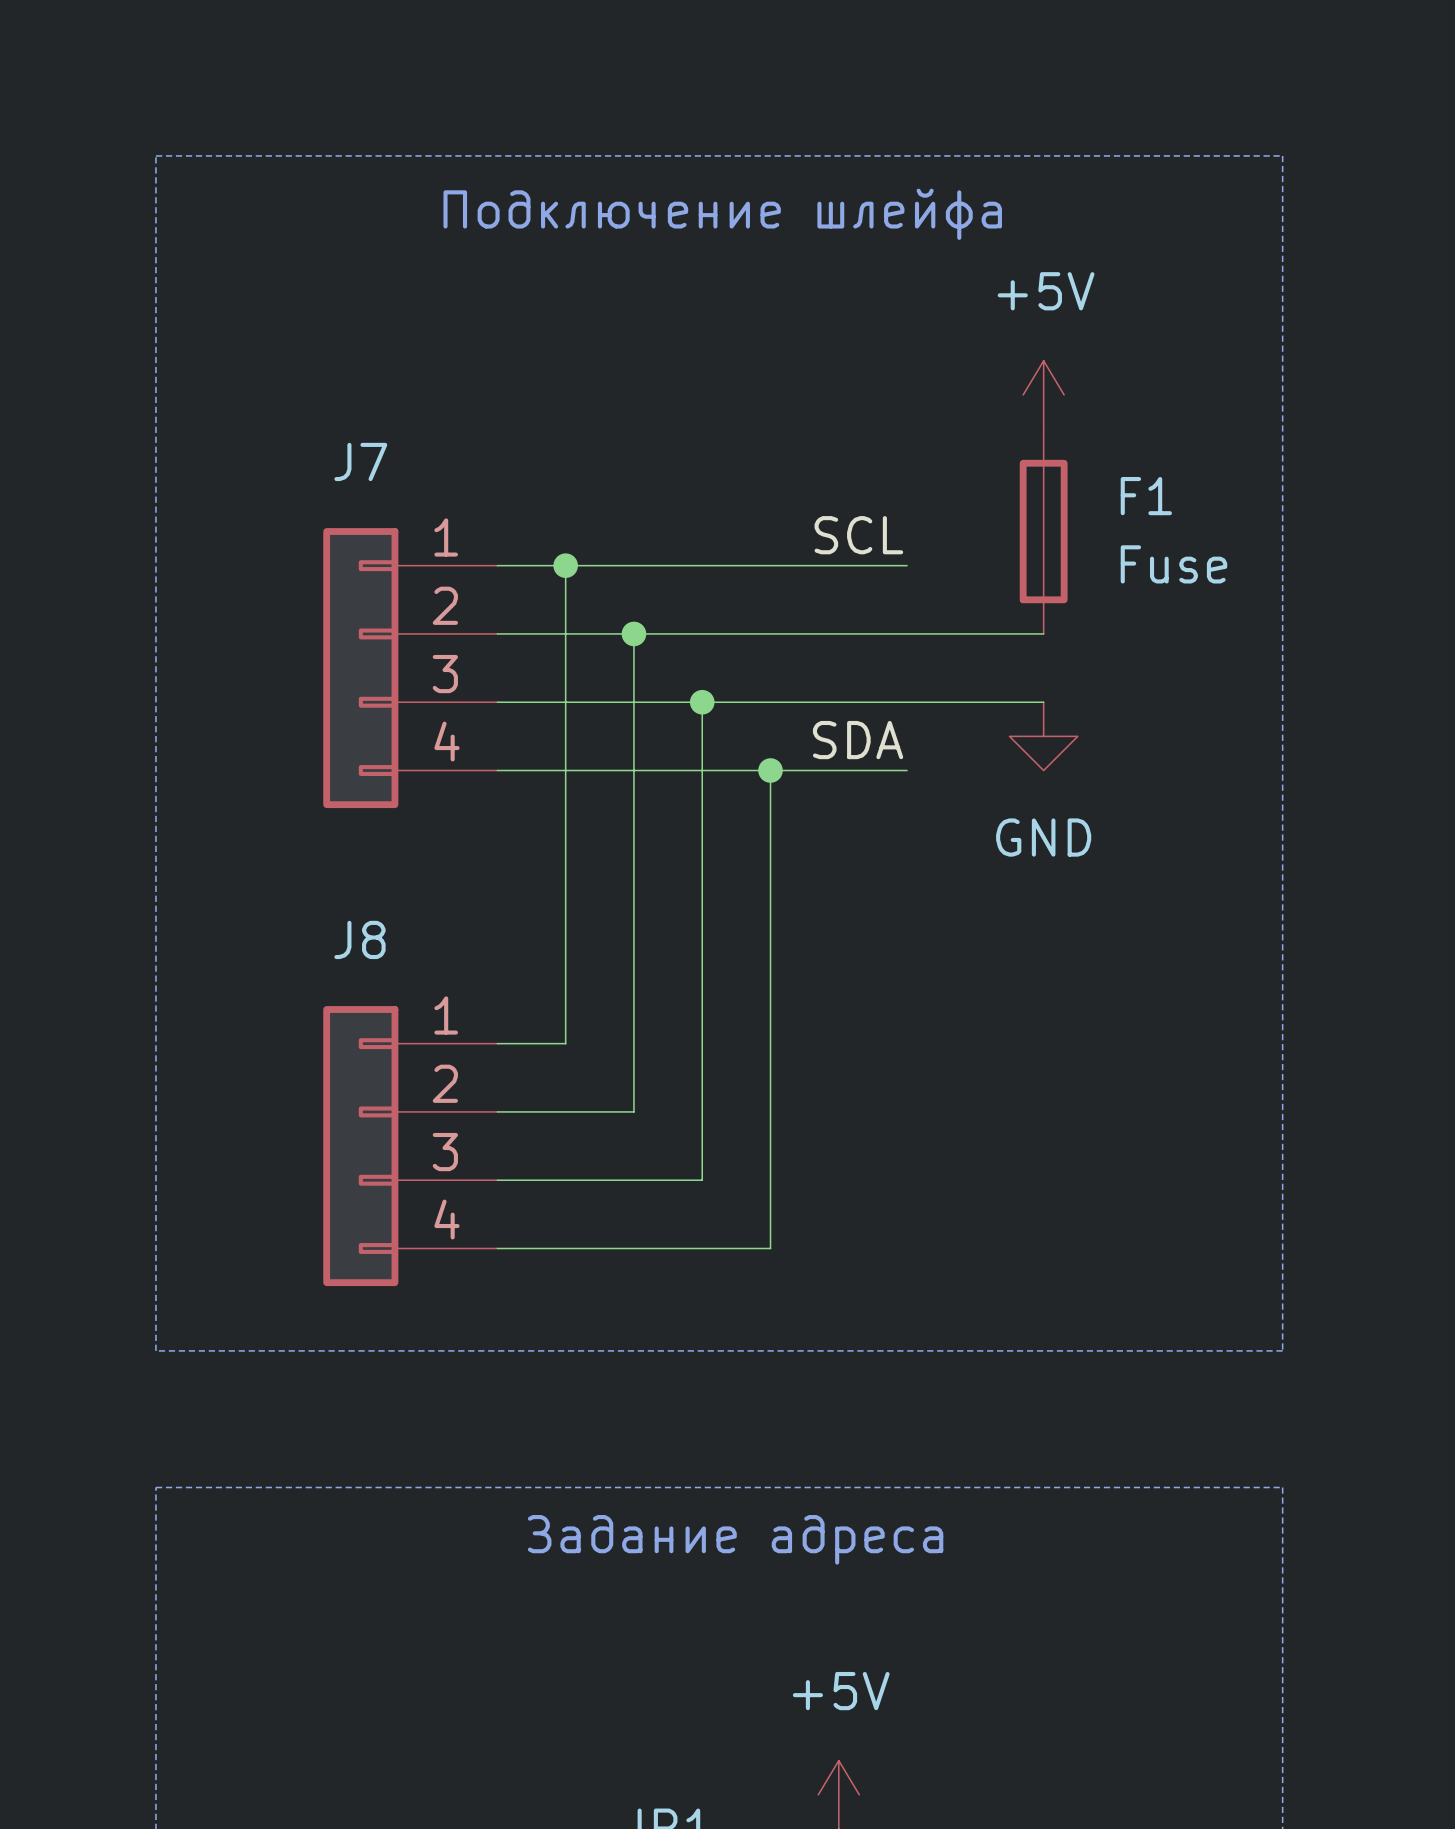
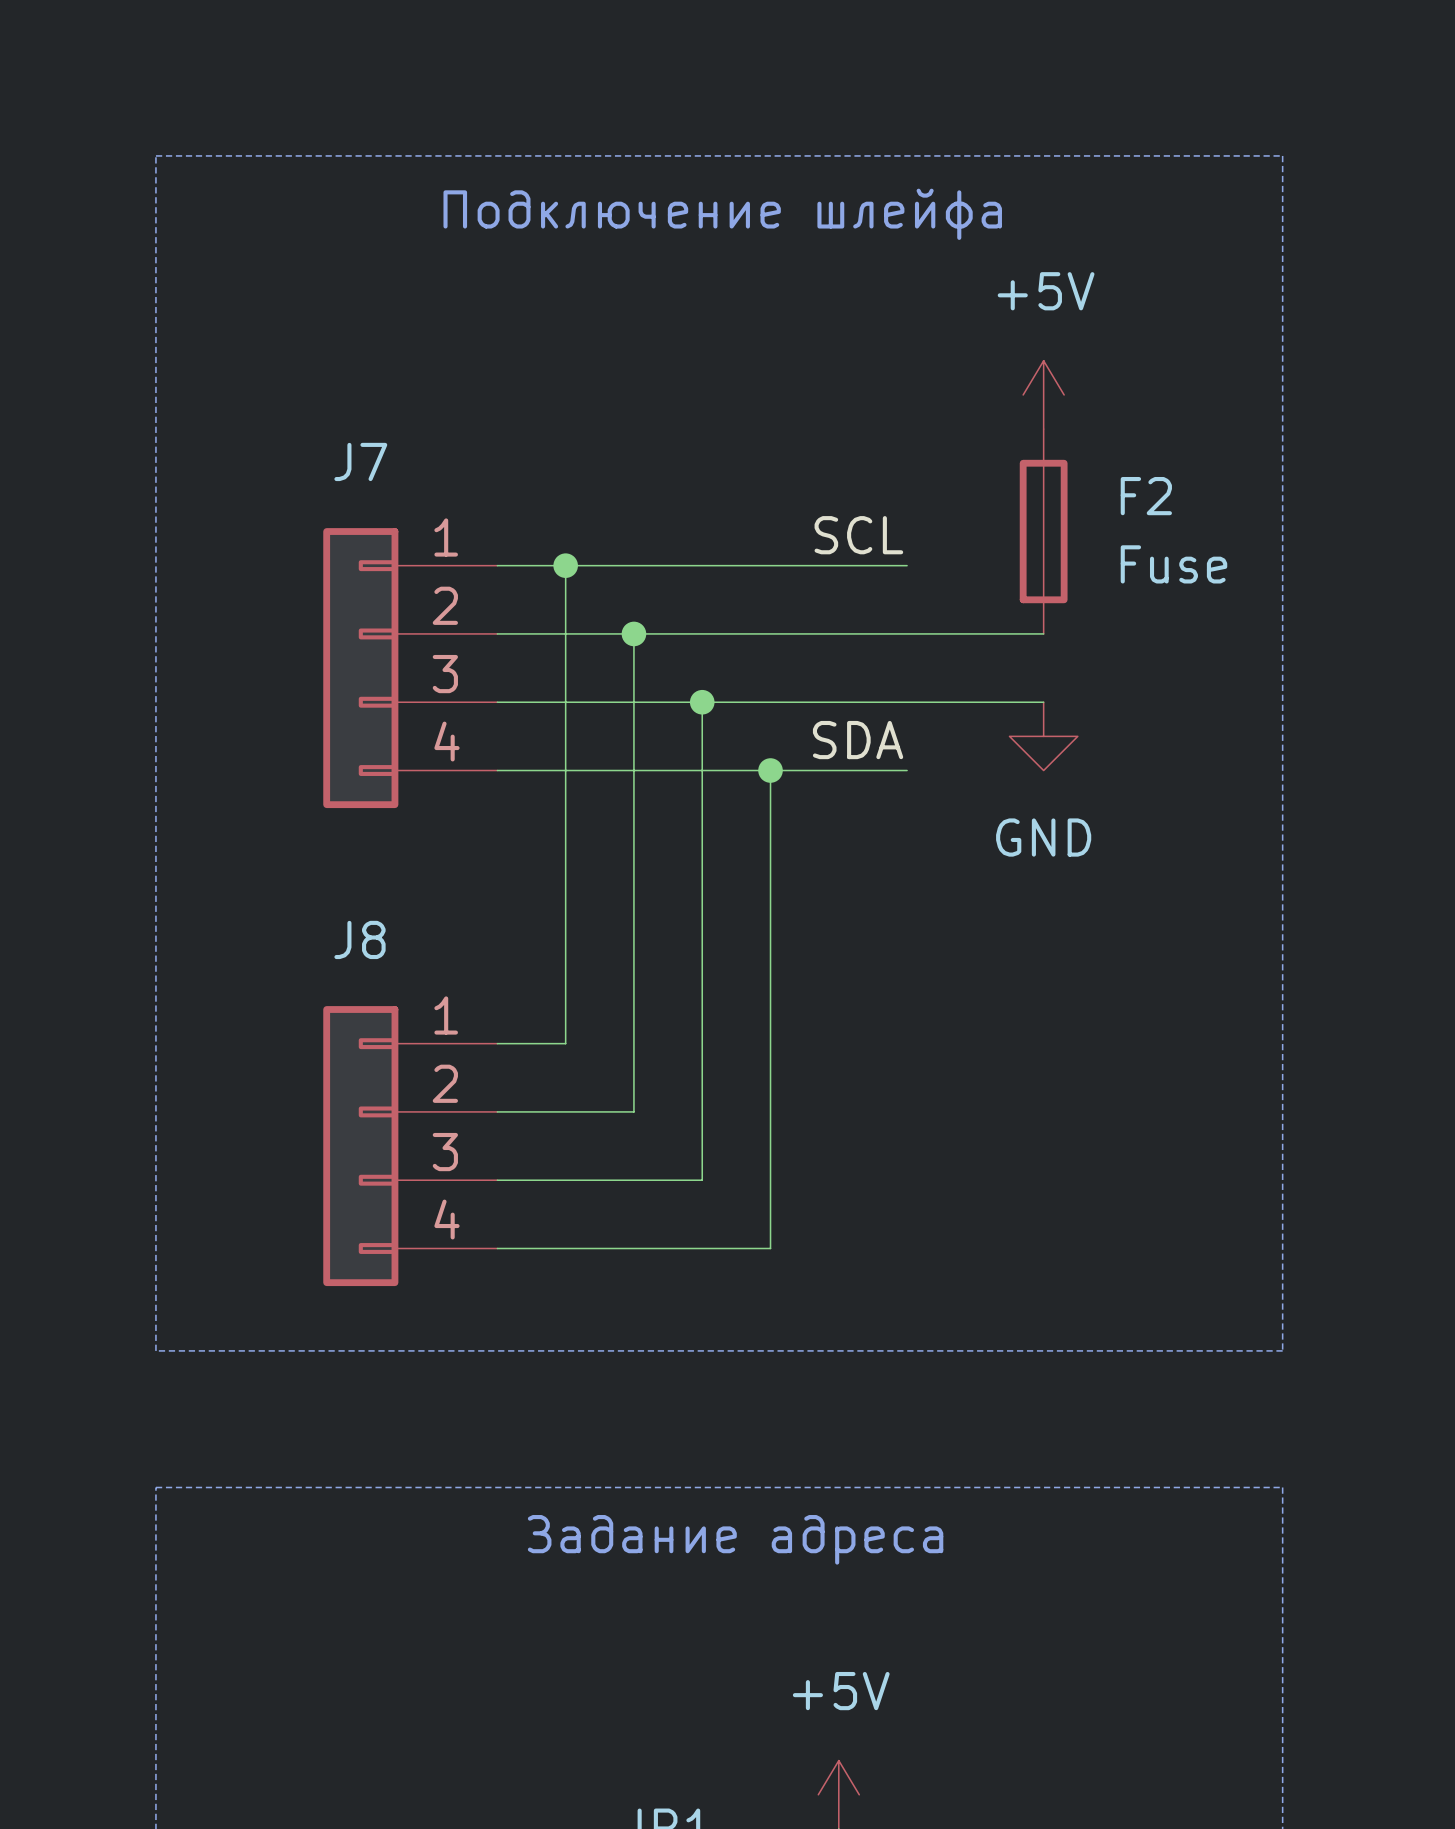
F1 name: F1 (1146, 496) -> F2 (1146, 496)

